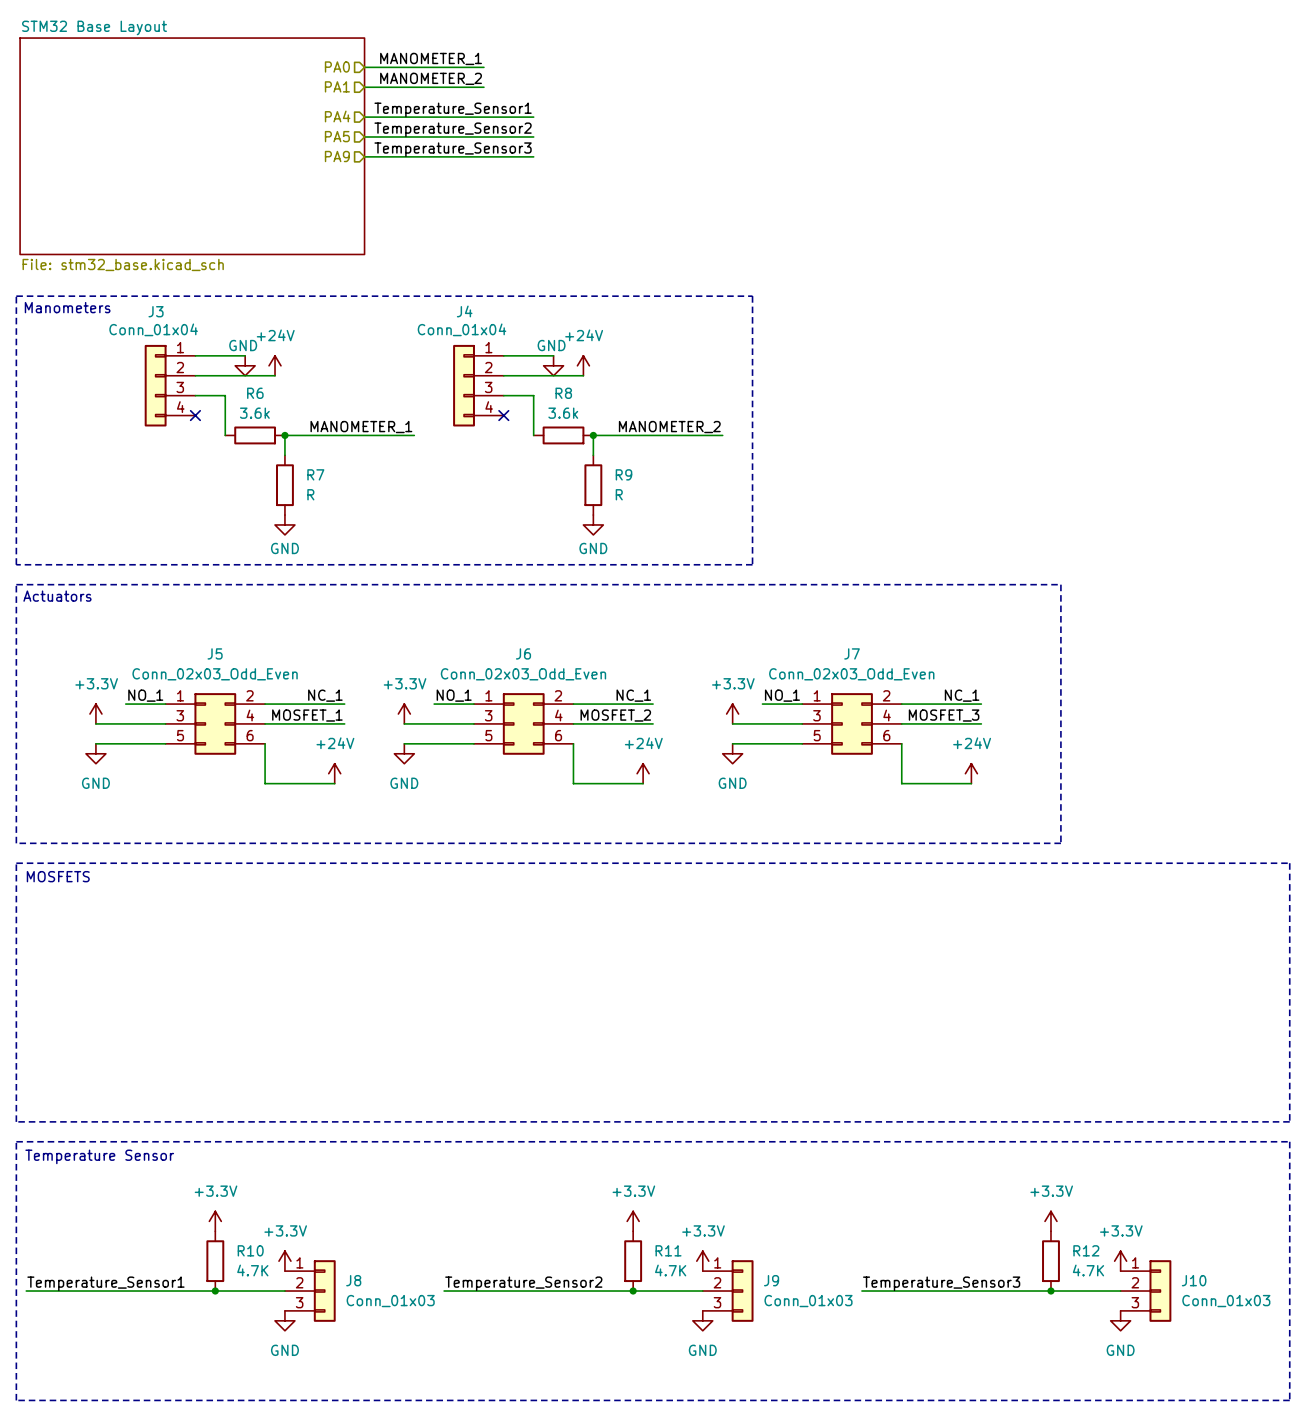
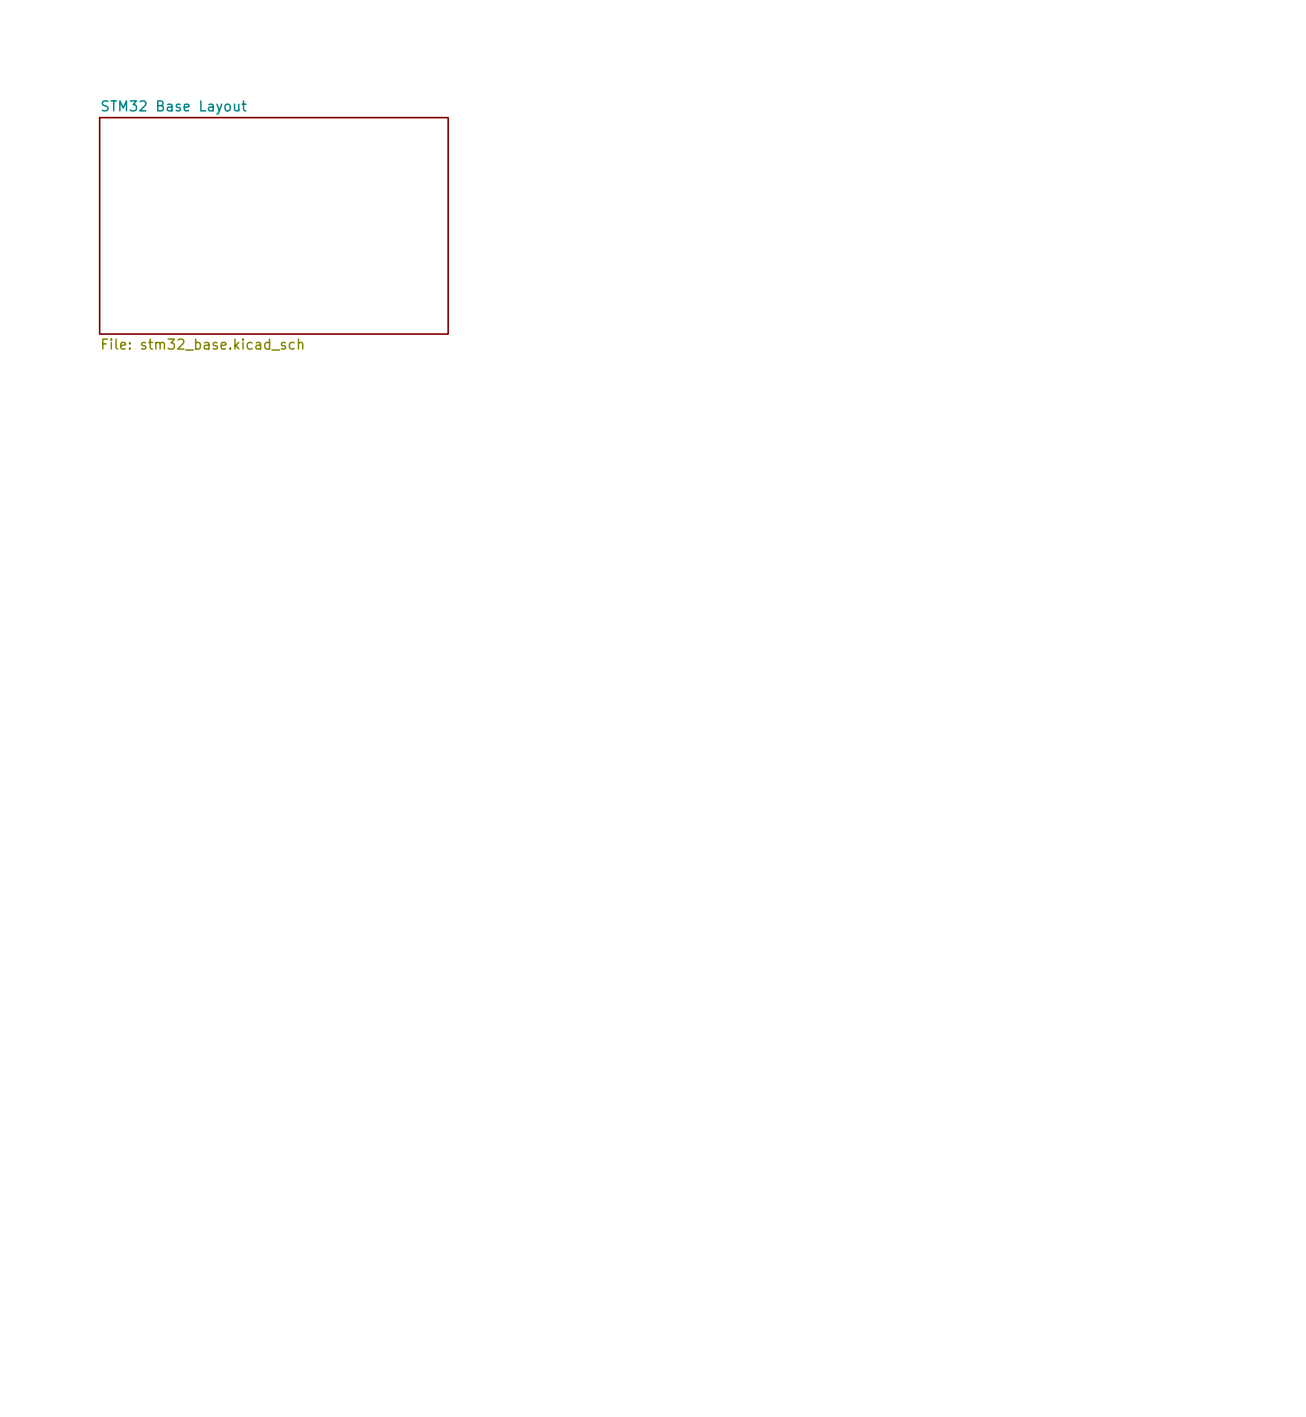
sheet STM32 Base Layout shape: [19, 37, 366, 256] -> [99, 117, 449, 335]
label: MANOMETER_1 (431, 58) -> none
hierarchical label: PA0 (337, 66) -> none
wire: (364, 67) (483, 67) -> none
label: MANOMETER_2 (431, 78) -> none
hierarchical label: PA1 (337, 86) -> none
wire: (364, 87) (483, 87) -> none
label: Temperature_Sensor1 (453, 109) -> none
hierarchical label: PA4 (337, 116) -> none
wire: (364, 117) (533, 117) -> none
label: Temperature_Sensor2 (453, 129) -> none
hierarchical label: PA5 (337, 136) -> none
wire: (364, 136) (533, 136) -> none
label: Temperature_Sensor3 (453, 149) -> none
hierarchical label: PA9 (337, 156) -> none
wire: (364, 156) (533, 156) -> none
line: (16, 296) (16, 564) (752, 564) (752, 296) (16, 296) -> none
text: Manometers (67, 307) -> none
wire: (195, 355) (245, 355) -> none
wire: (503, 355) (553, 355) -> none
power symbol: GND (245, 365) -> none
power symbol: +24V (275, 365) -> none
power symbol: GND (553, 365) -> none
power symbol: +24V (583, 365) -> none
wire: (195, 375) (275, 375) -> none
wire: (503, 375) (583, 375) -> none
J3: Conn_01x04 (170, 385) -> none
J4: Conn_01x04 (478, 385) -> none
wire: (195, 395) (225, 395) (225, 435) -> none
wire: (503, 395) (533, 395) (533, 435) -> none
no-connect mark: (195, 415) -> none
no-connect mark: (503, 415) -> none
label: MANOMETER_1 (361, 427) -> none
label: MANOMETER_2 (669, 427) -> none
R6: 3.6k (255, 435) -> none
junction: (284, 435) -> none
wire: (414, 435) (284, 435) (284, 455) -> none
R8: 3.6k (563, 435) -> none
junction: (593, 435) -> none
wire: (722, 435) (593, 435) (593, 455) -> none
R7: R (284, 485) -> none
R9: R (593, 485) -> none
power symbol: GND (284, 524) -> none
power symbol: GND (593, 524) -> none
line: (16, 584) (1060, 584) (1060, 843) (16, 843) (16, 584) -> none
text: Actuators (57, 596) -> none
label: NO_1 (145, 695) -> none
label: NC_1 (325, 695) -> none
label: NO_1 (454, 695) -> none
label: NC_1 (633, 695) -> none
label: NO_1 (782, 695) -> none
label: NC_1 (962, 695) -> none
wire: (125, 704) (165, 704) -> none
wire: (265, 704) (344, 704) -> none
wire: (434, 704) (473, 704) -> none
wire: (573, 704) (653, 704) -> none
wire: (762, 704) (802, 704) -> none
wire: (901, 704) (981, 704) -> none
power symbol: +3.3V (95, 714) -> none
power symbol: +3.3V (404, 714) -> none
power symbol: +3.3V (732, 714) -> none
label: MOSFET_1 (307, 715) -> none
label: MOSFET_2 (615, 715) -> none
label: MOSFET_3 (944, 715) -> none
wire: (95, 723) (165, 723) -> none
J5: Conn_02x03_Odd_Even (215, 723) -> none
wire: (265, 723) (344, 723) -> none
wire: (404, 723) (473, 723) -> none
J6: Conn_02x03_Odd_Even (523, 723) -> none
wire: (573, 723) (653, 723) -> none
wire: (732, 723) (802, 723) -> none
J7: Conn_02x03_Odd_Even (852, 723) -> none
wire: (901, 723) (981, 723) -> none
wire: (95, 743) (165, 743) -> none
wire: (265, 743) (265, 783) (334, 783) -> none
wire: (404, 743) (473, 743) -> none
wire: (573, 743) (573, 783) (643, 783) -> none
wire: (732, 743) (802, 743) -> none
wire: (901, 743) (901, 783) (971, 783) -> none
power symbol: GND (95, 753) -> none
power symbol: GND (404, 753) -> none
power symbol: GND (732, 753) -> none
power symbol: +24V (334, 773) -> none
power symbol: +24V (643, 773) -> none
power symbol: +24V (971, 773) -> none
line: (16, 863) (16, 1121) (1289, 1121) (1289, 863) (16, 863) -> none
text: MOSFETS (58, 876) -> none
line: (16, 1141) (16, 1400) (1289, 1400) (1289, 1141) (16, 1141) -> none
text: Temperature Sensor (99, 1156) -> none
power symbol: +3.3V (215, 1221) -> none
power symbol: +3.3V (633, 1221) -> none
power symbol: +3.3V (1050, 1221) -> none
R10: 4.7K (215, 1261) -> none
power symbol: +3.3V (284, 1261) -> none
R11: 4.7K (633, 1261) -> none
power symbol: +3.3V (702, 1261) -> none
R12: 4.7K (1050, 1261) -> none
power symbol: +3.3V (1120, 1261) -> none
label: Temperature_Sensor1 (105, 1283) -> none
label: Temperature_Sensor2 (523, 1283) -> none
label: Temperature_Sensor3 (941, 1283) -> none
wire: (26, 1291) (284, 1291) -> none
junction: (215, 1291) -> none
J8: Conn_01x03 (310, 1291) -> none
wire: (444, 1291) (702, 1291) -> none
junction: (633, 1291) -> none
J9: Conn_01x03 (728, 1291) -> none
wire: (861, 1291) (1120, 1291) -> none
junction: (1050, 1291) -> none
J10: Conn_01x03 (1145, 1291) -> none
power symbol: GND (284, 1320) -> none
power symbol: GND (702, 1320) -> none
power symbol: GND (1120, 1320) -> none

